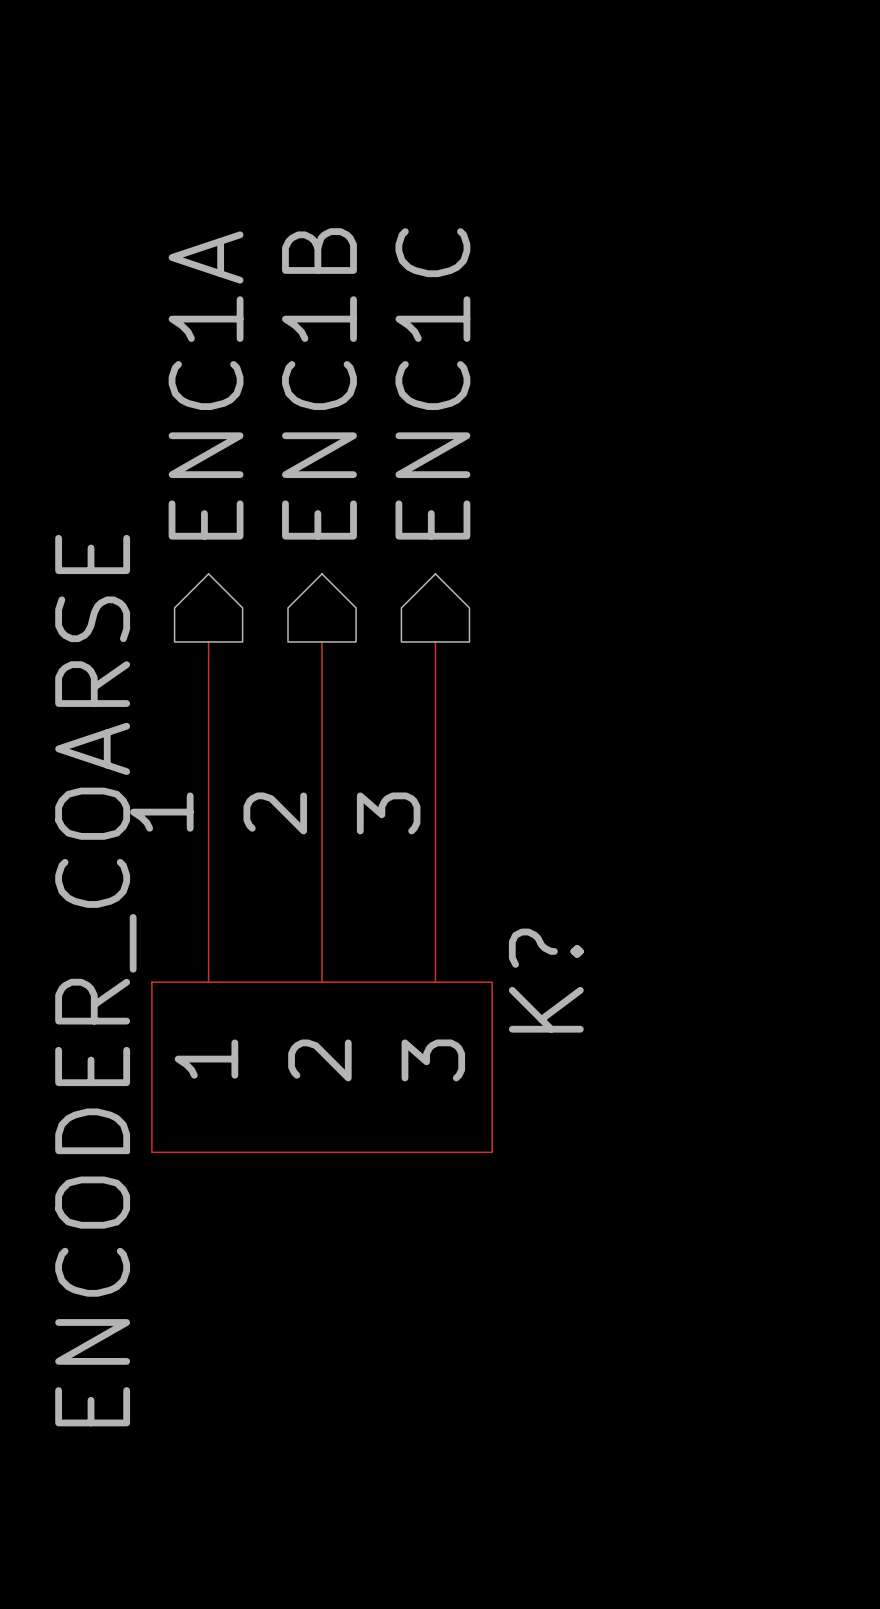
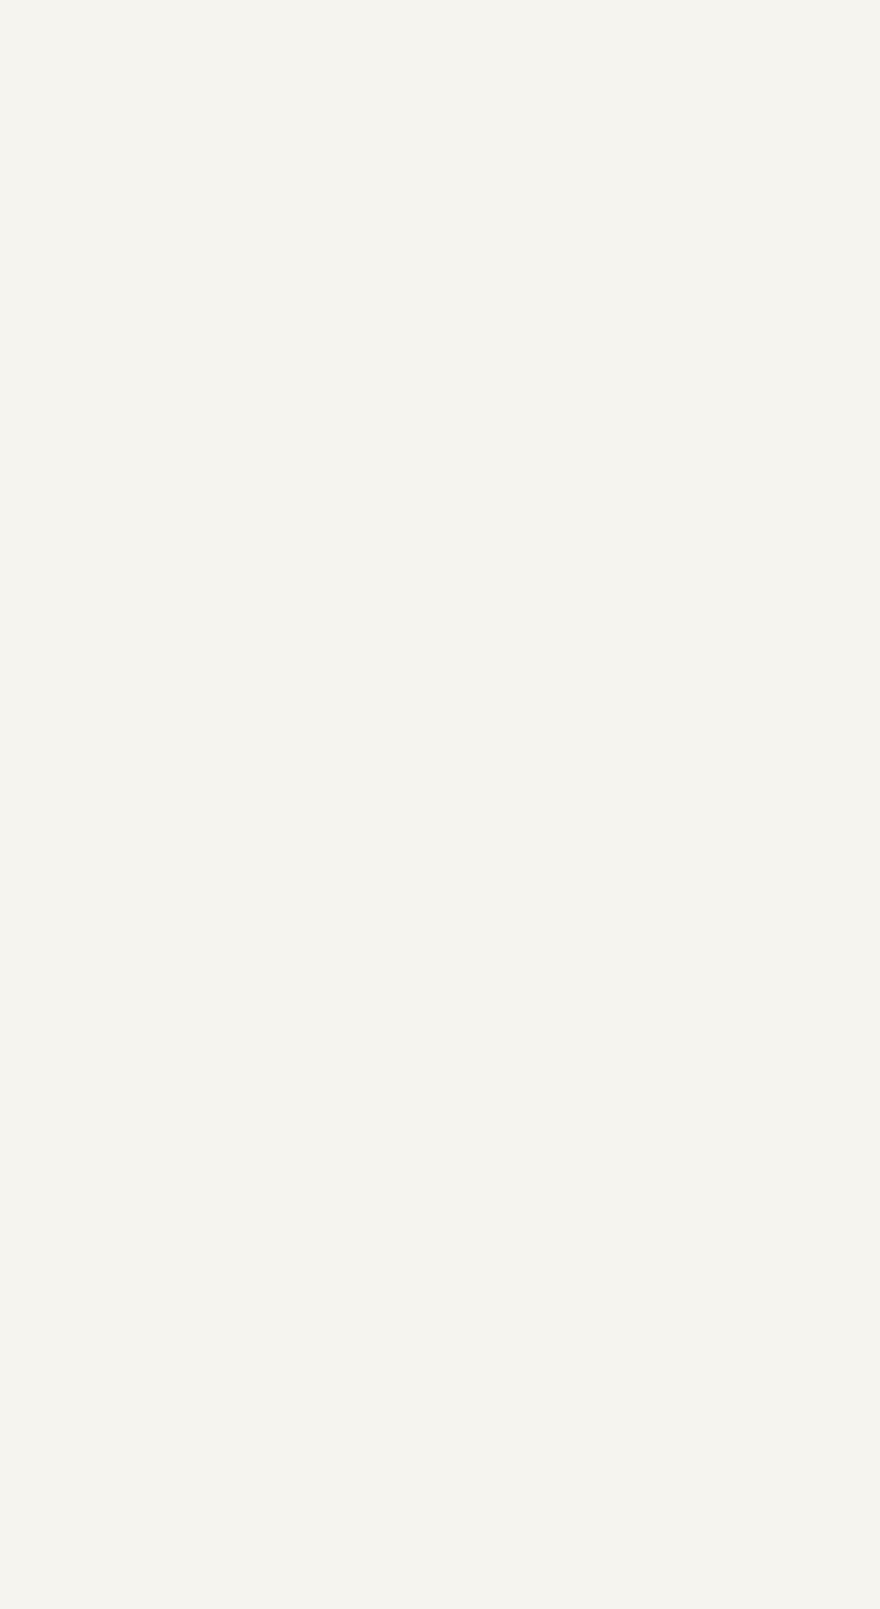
hierarchical label: ENC1B (319, 383) -> none
hierarchical label: ENC1C (432, 383) -> none
hierarchical label: ENC1A (206, 385) -> none
K?: ENCODER_COARSE (322, 897) -> none

